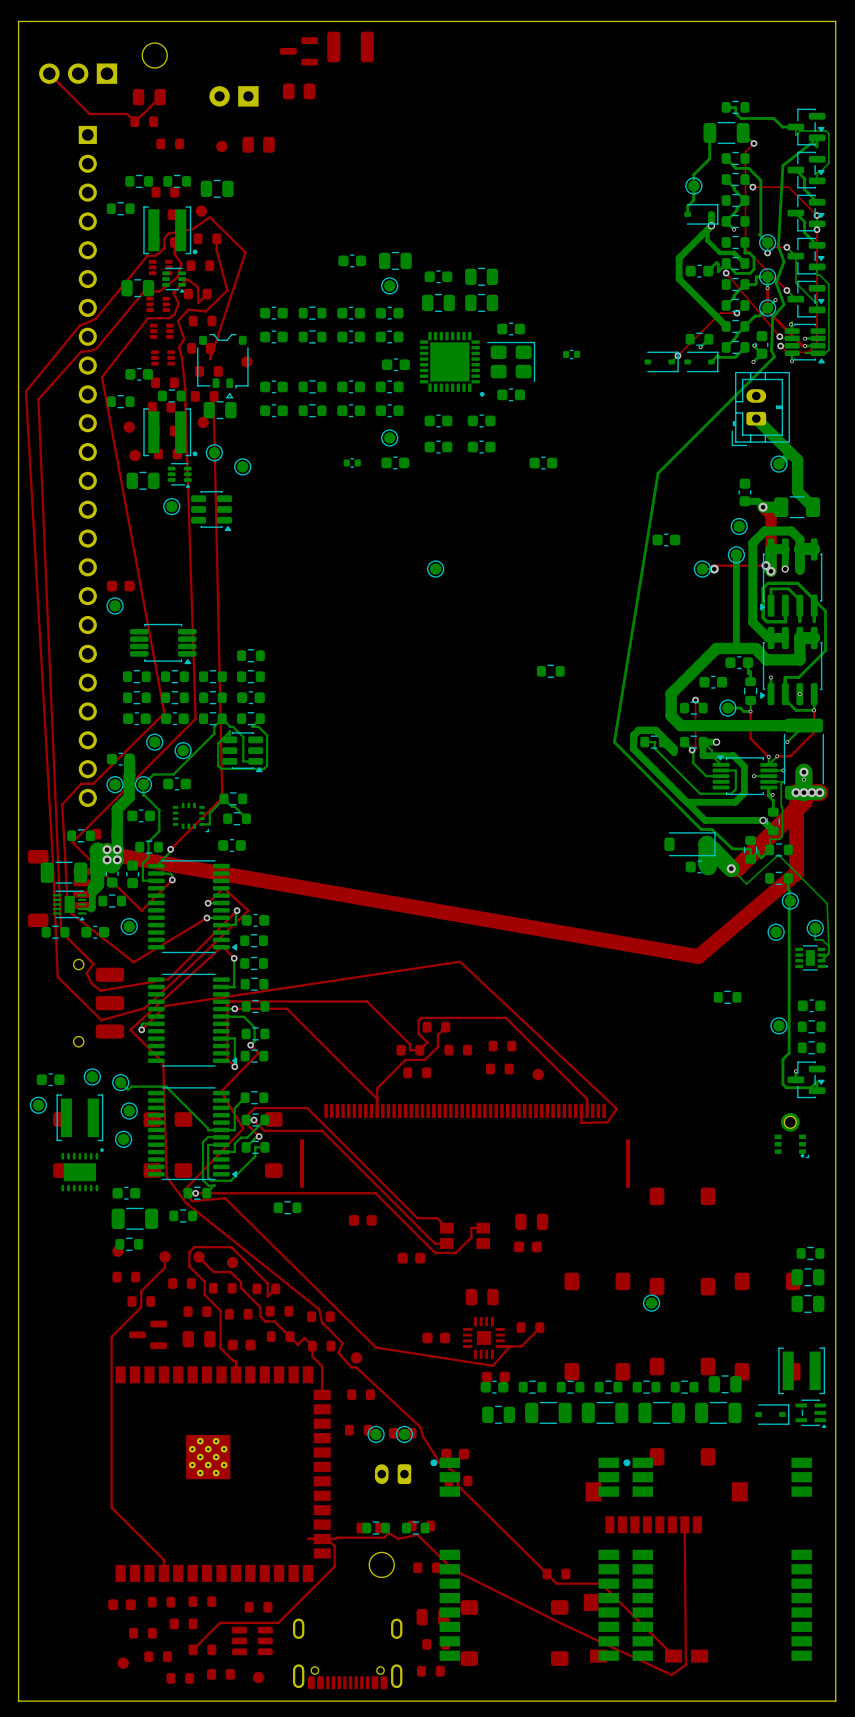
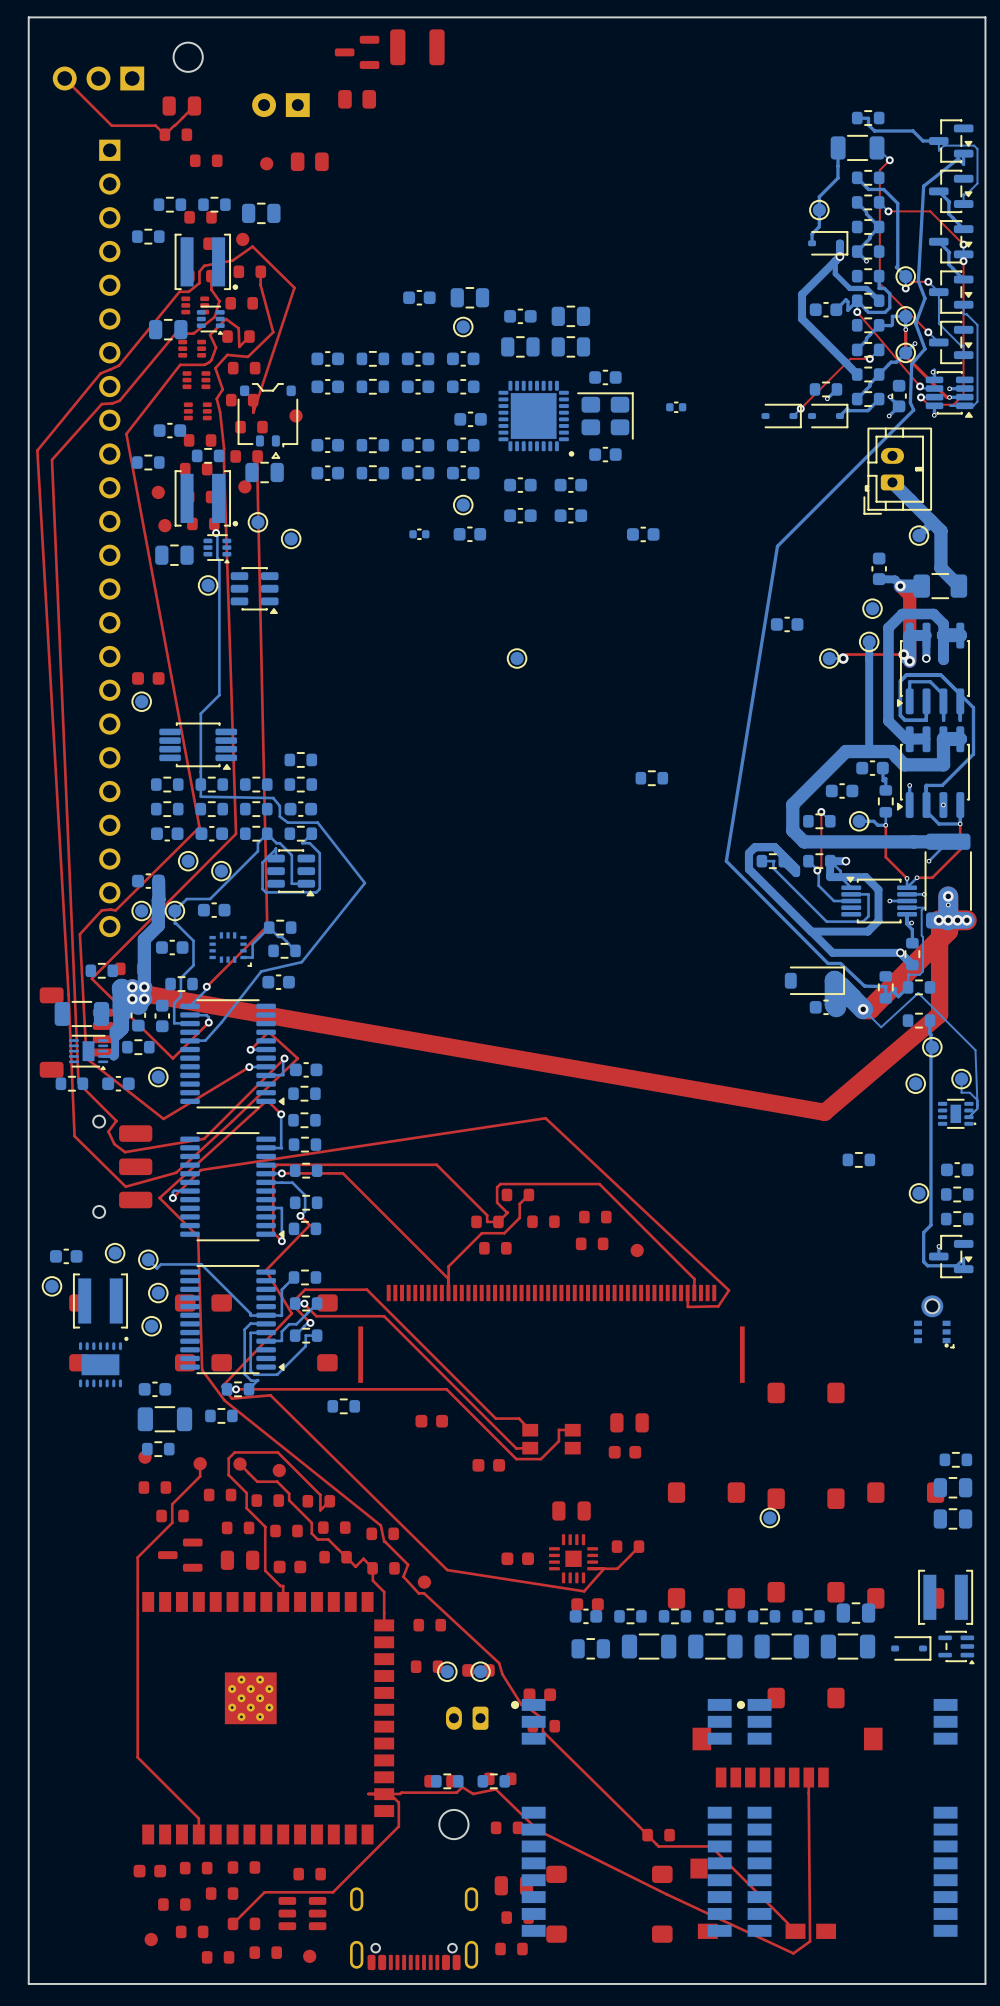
bottom track: none -> (216, 532) (217, 558) (219, 560) (219, 695) (200, 713) (200, 796) (273, 798) (279, 806) (279, 816) (287, 822) (317, 822) (364, 883) (301, 962) (261, 971) (205, 1040) (190, 1040)
via: none -> (216, 532)

